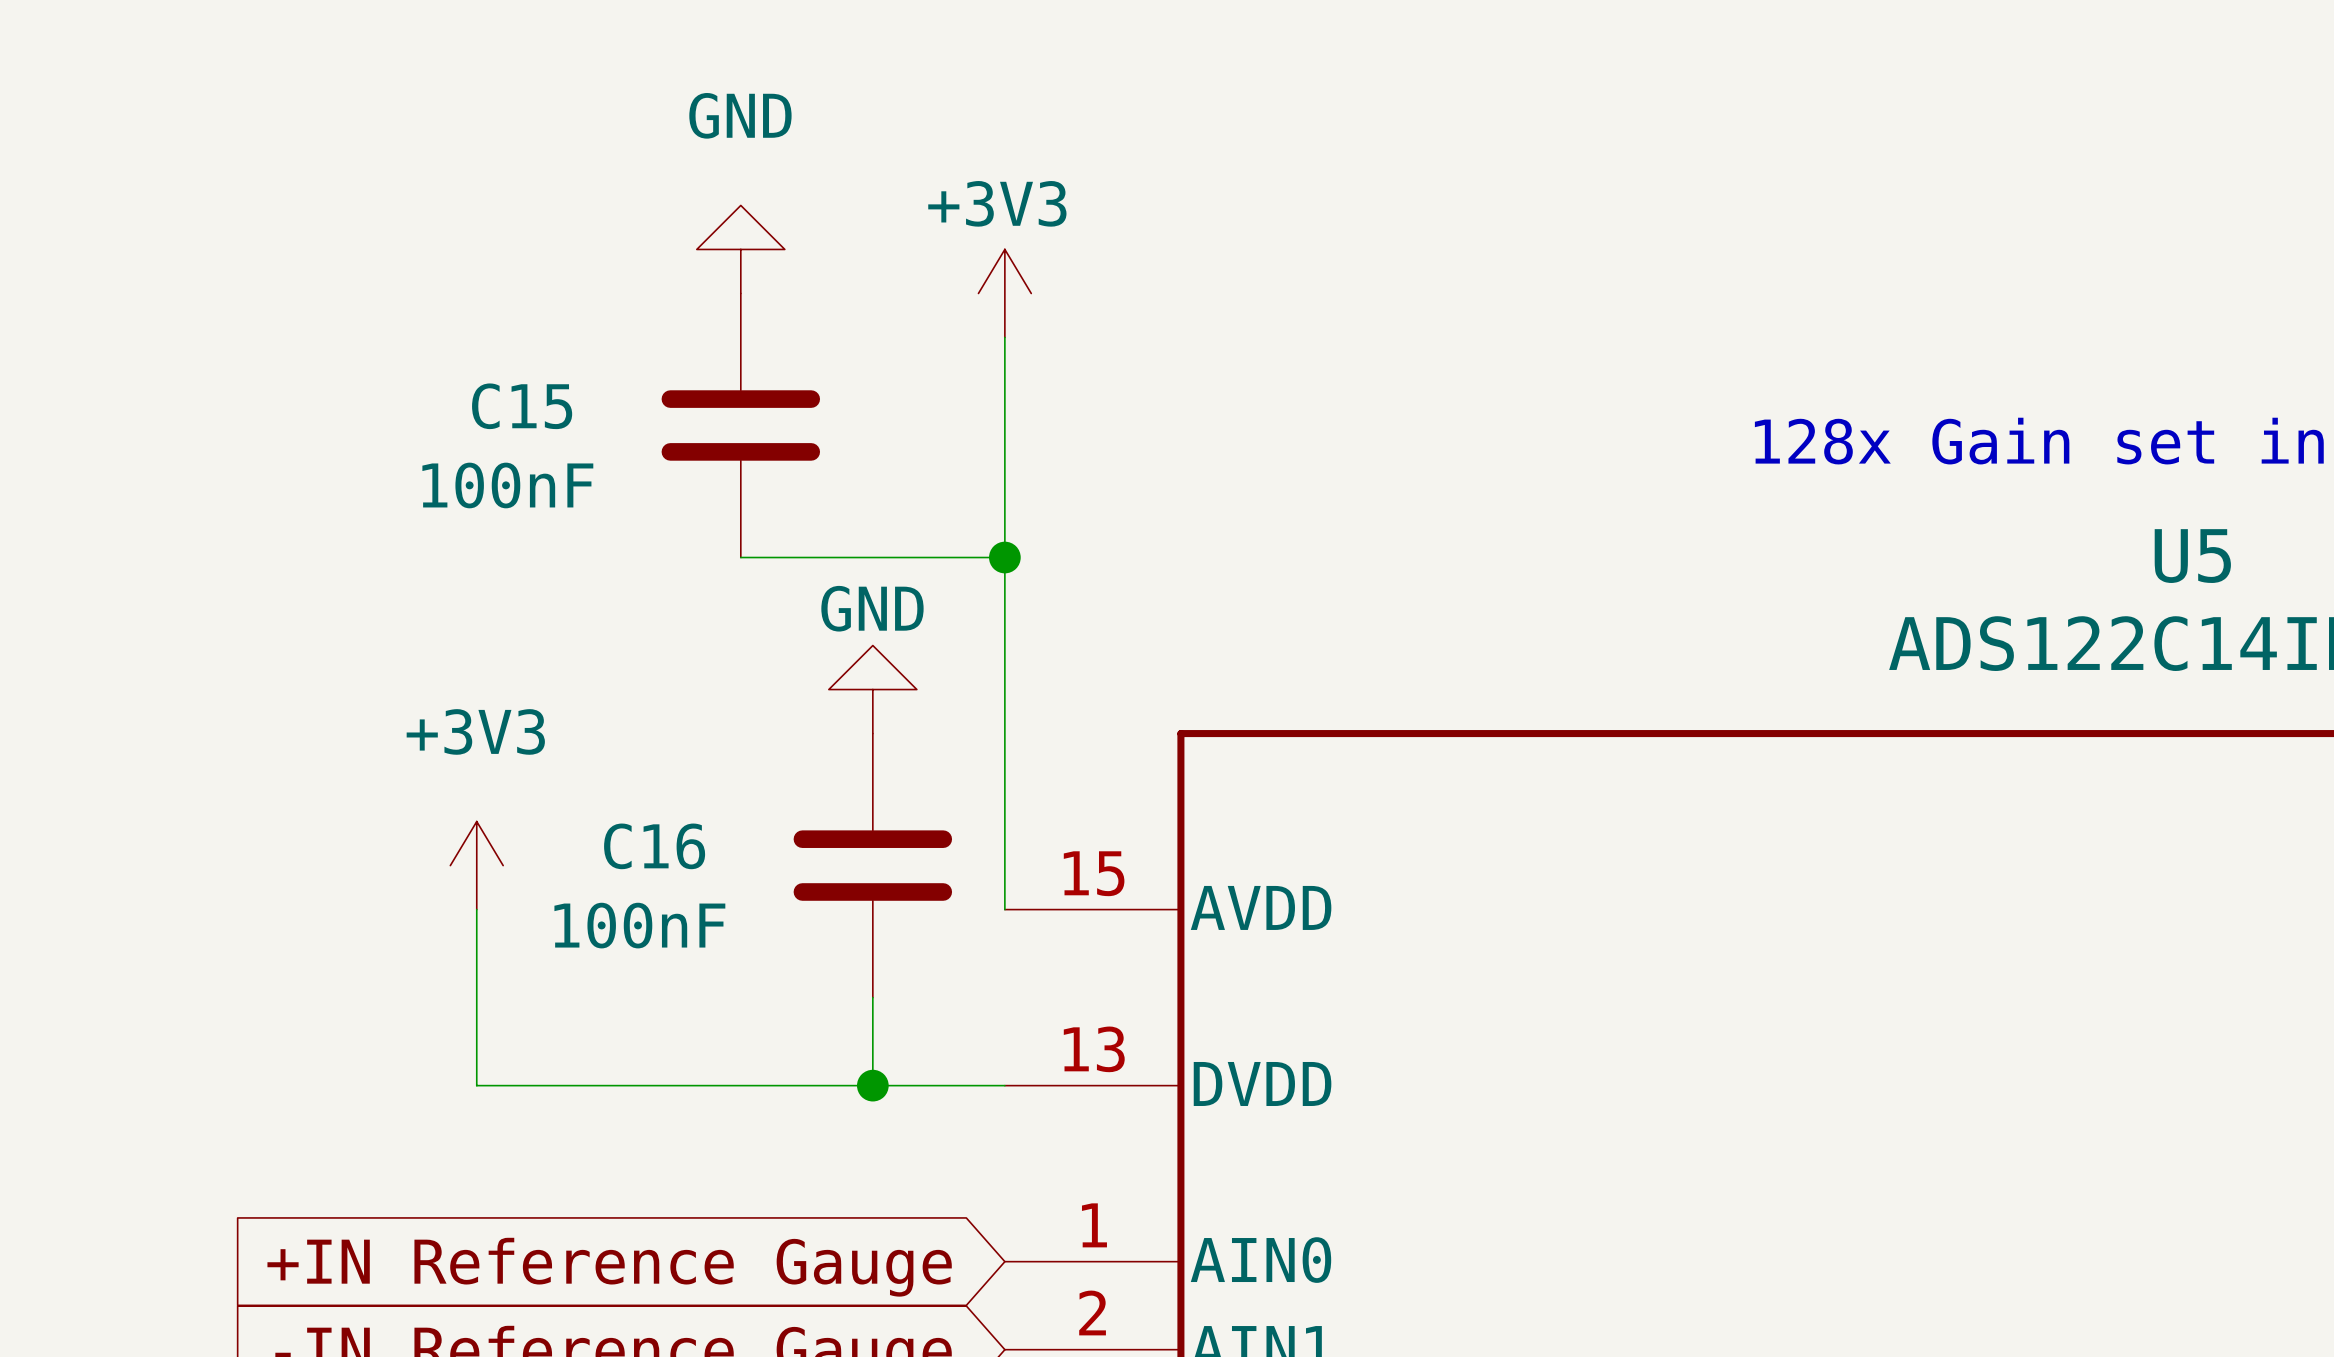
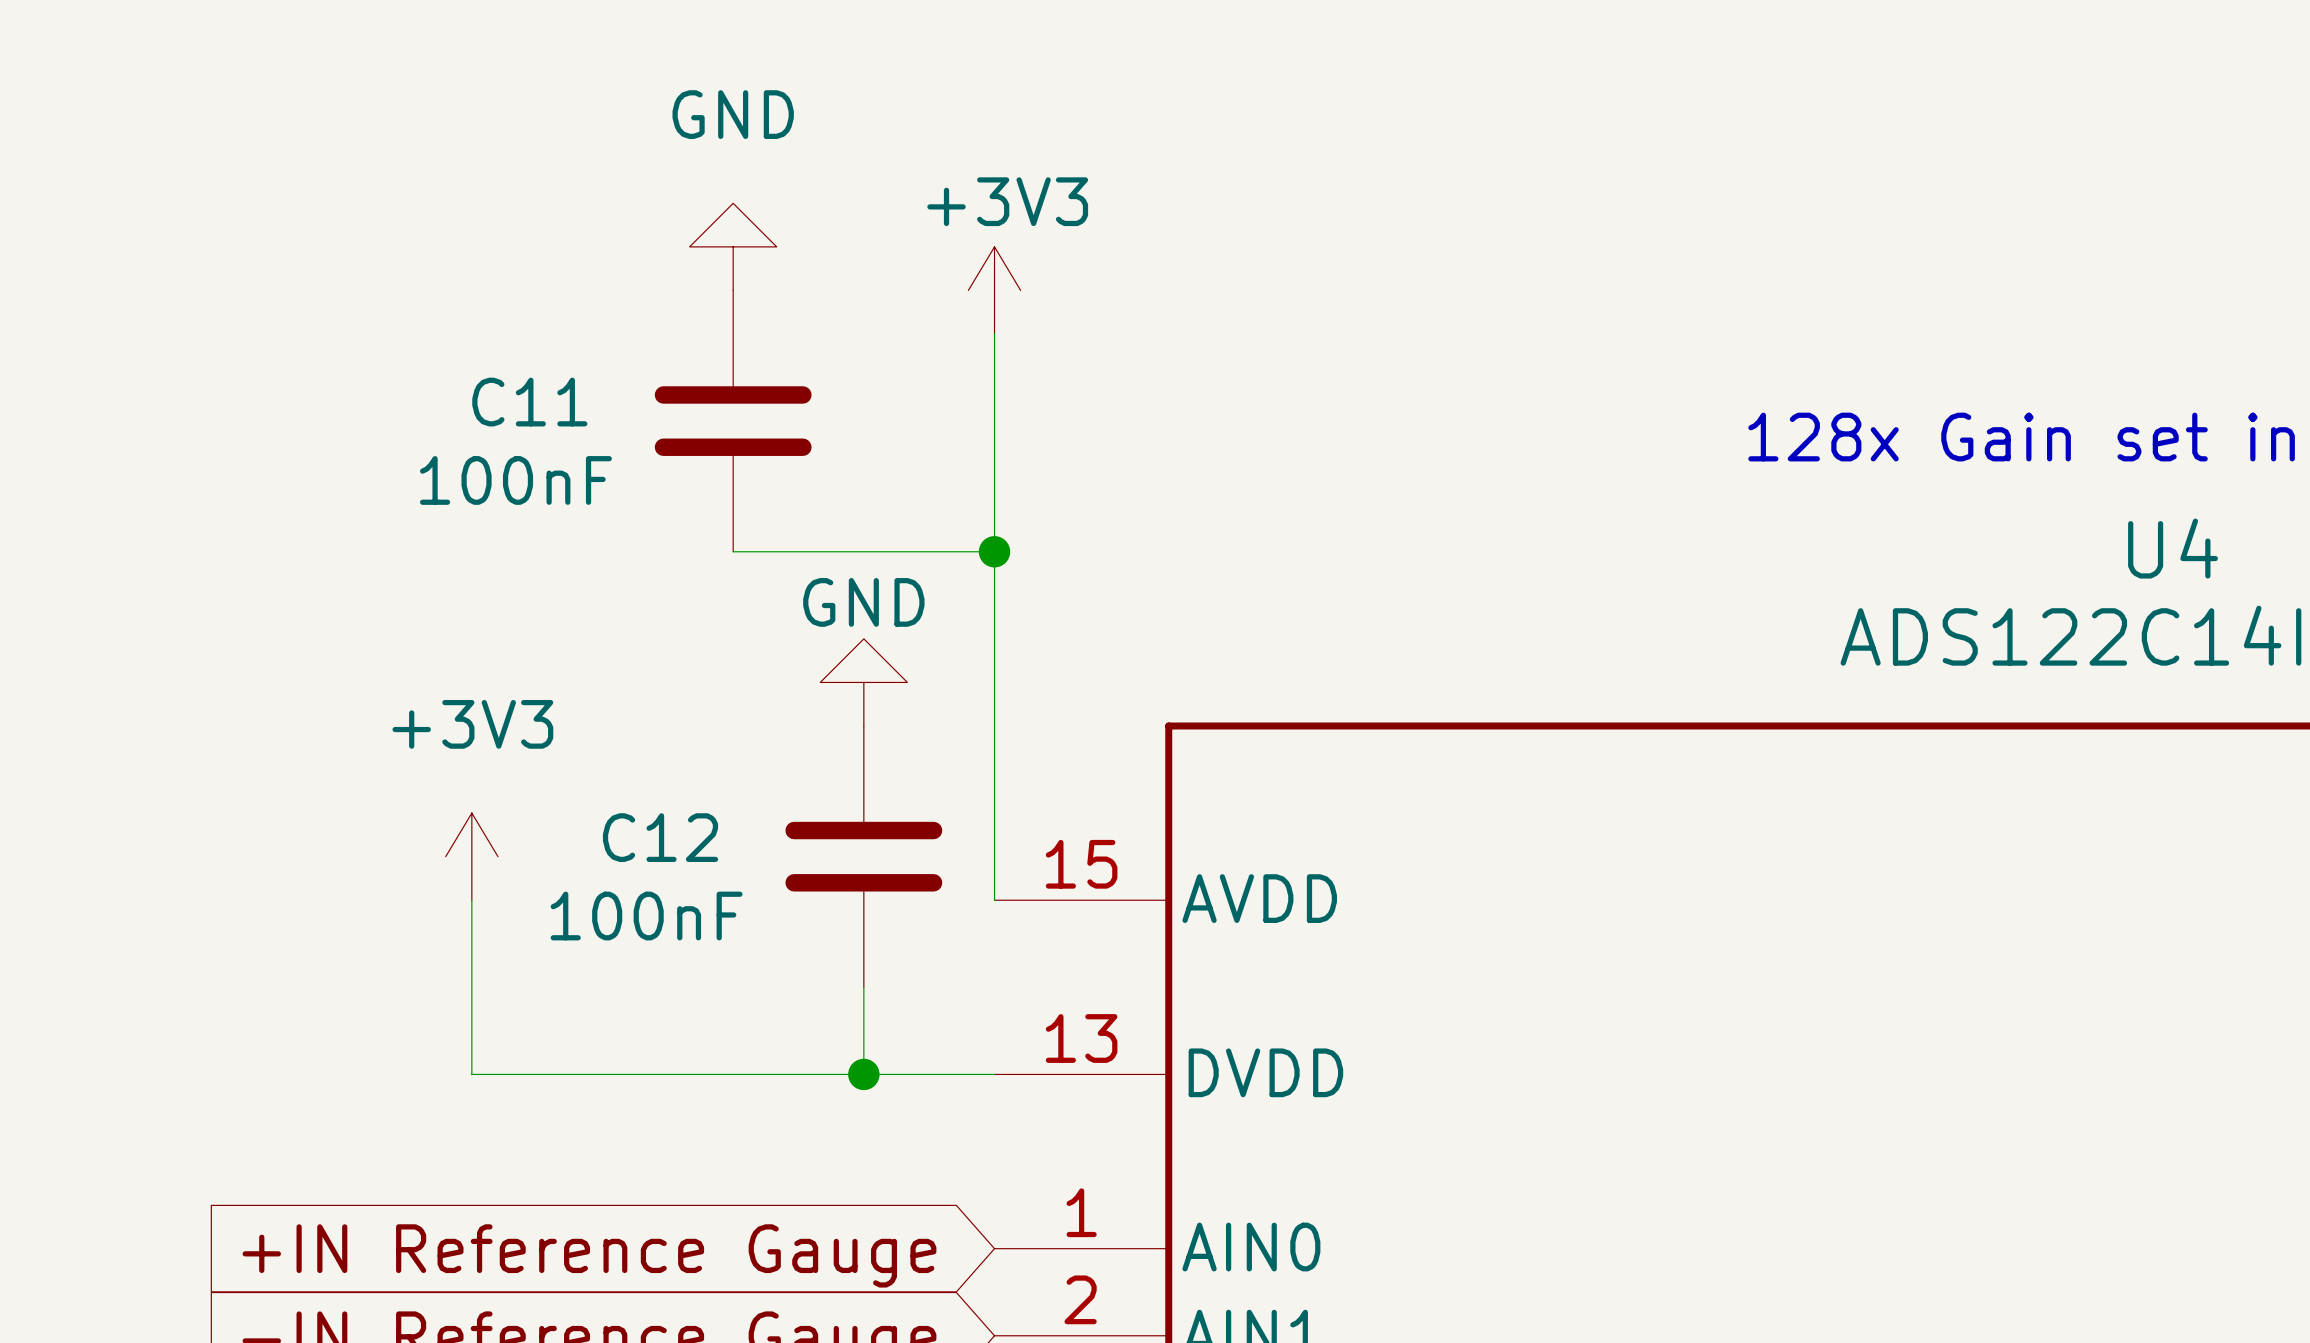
C15 name: C15 (522, 406) -> C11 (529, 402)
U5 name: U5 (2192, 556) -> U4 (2173, 548)
C16 name: C16 (654, 846) -> C12 (660, 837)

